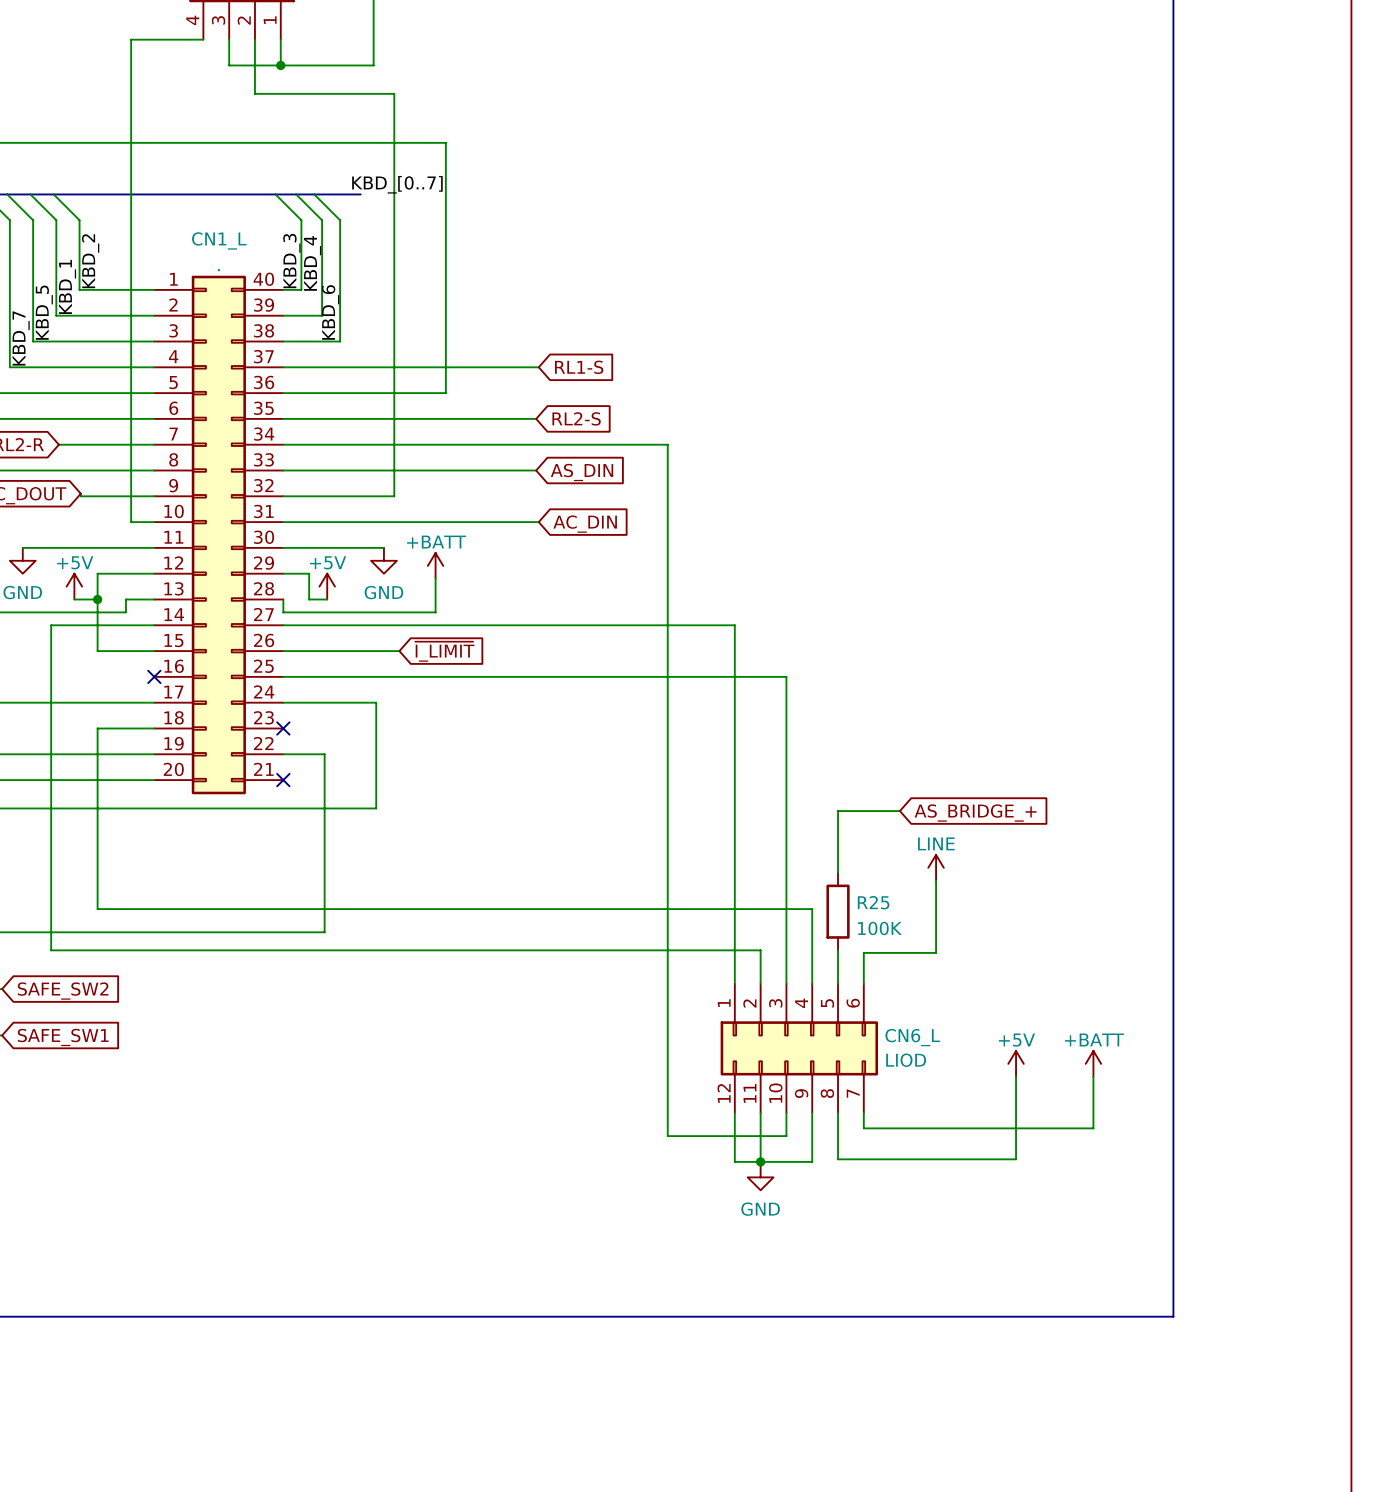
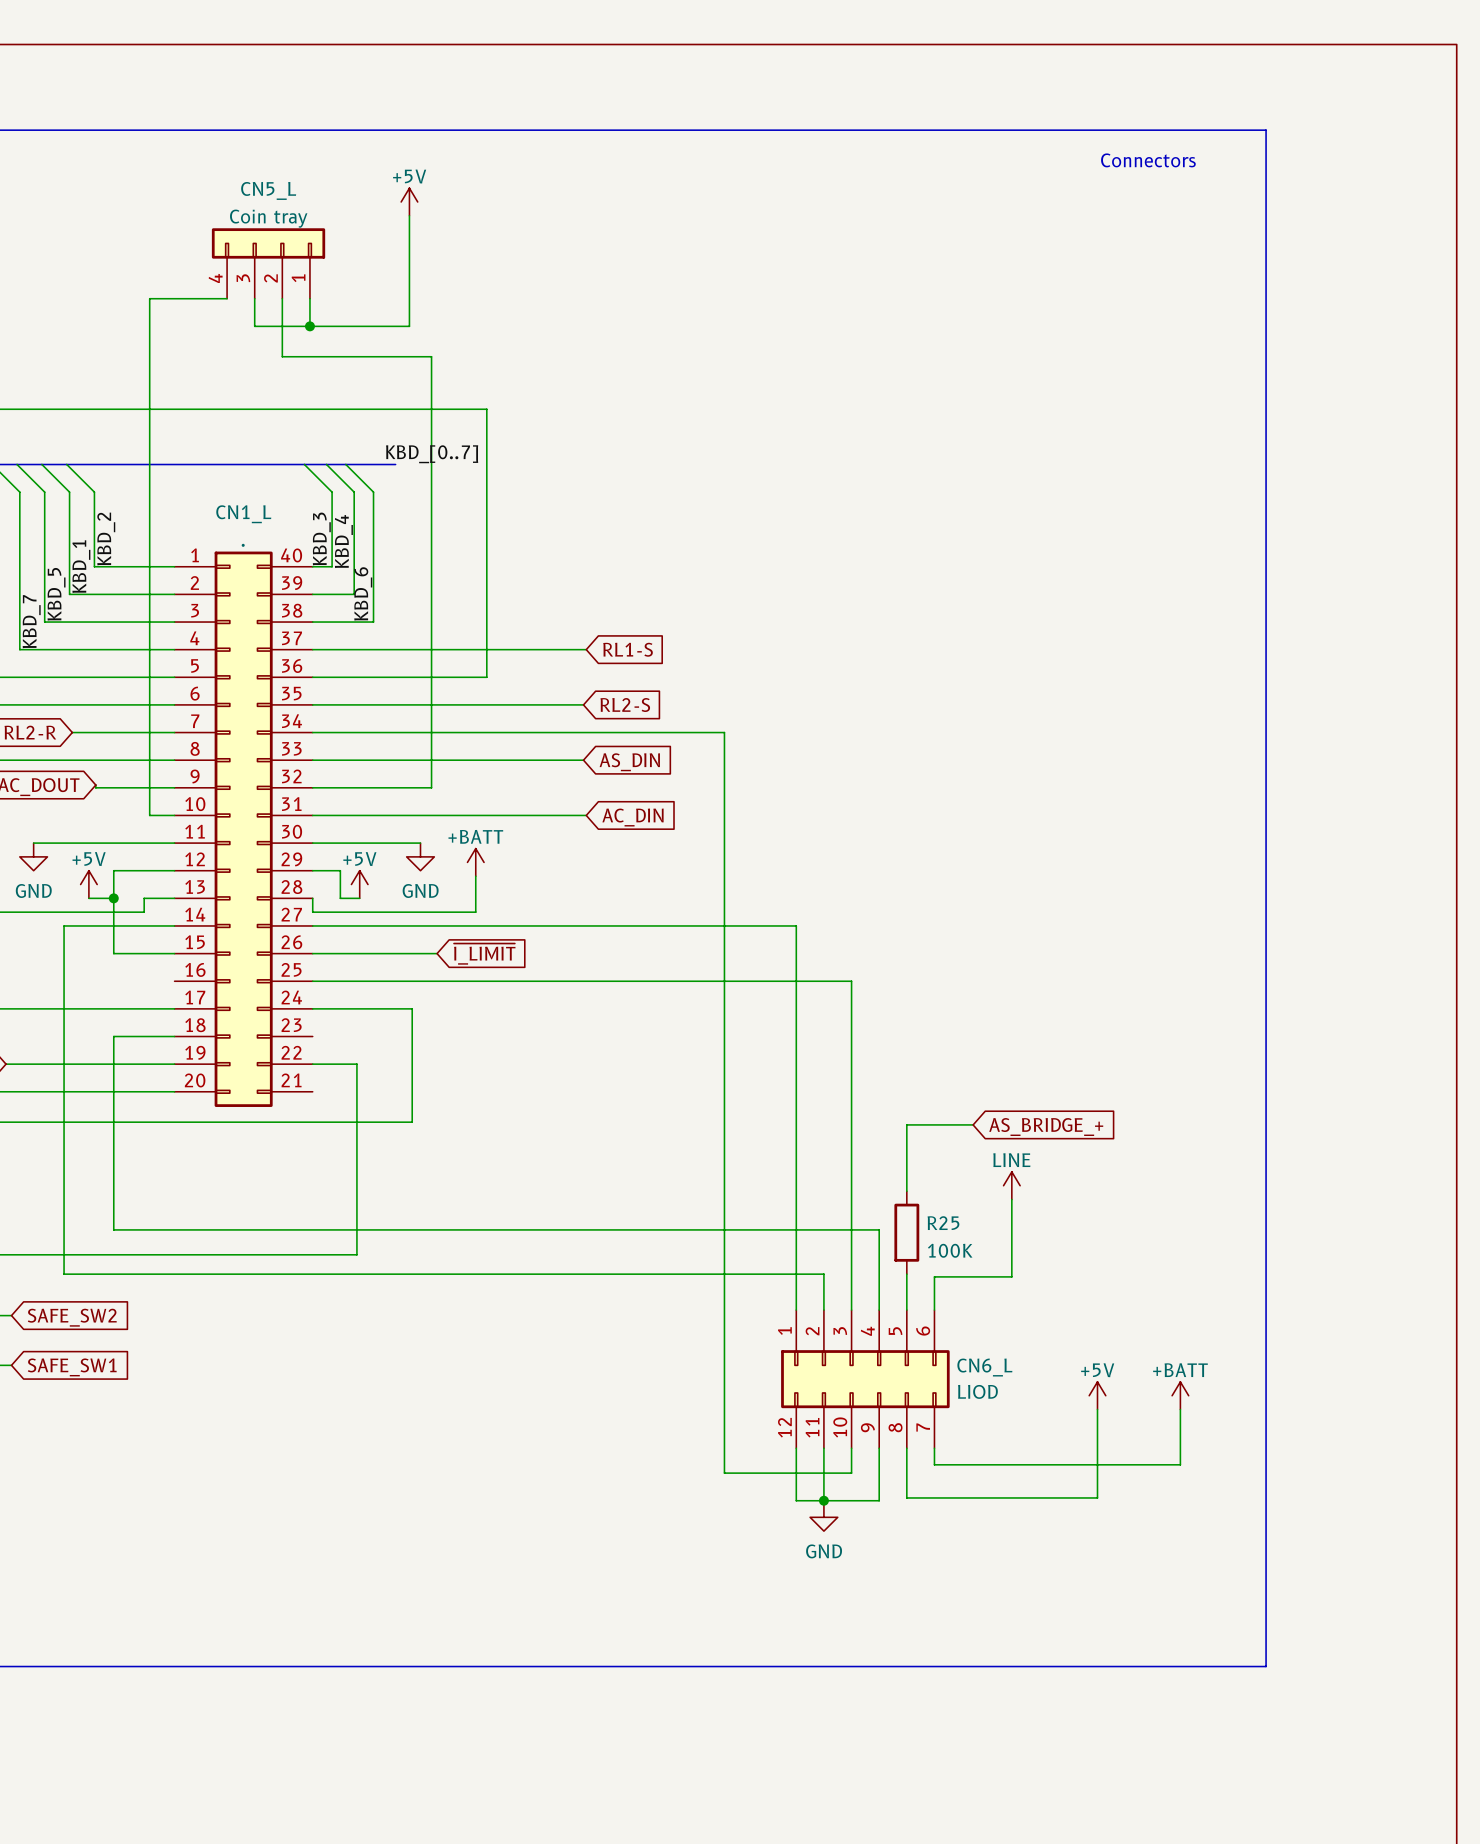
no-connect mark: (154, 676) -> none
no-connect mark: (283, 728) -> none
no-connect mark: (283, 780) -> none

